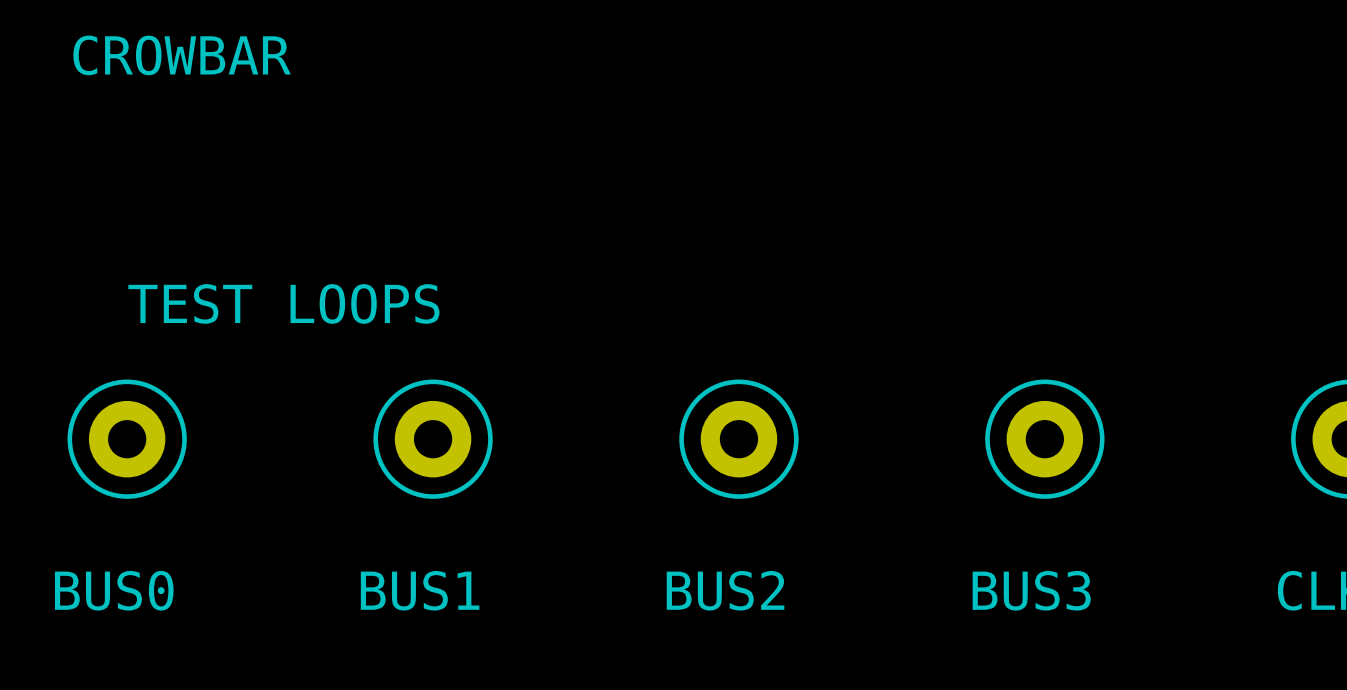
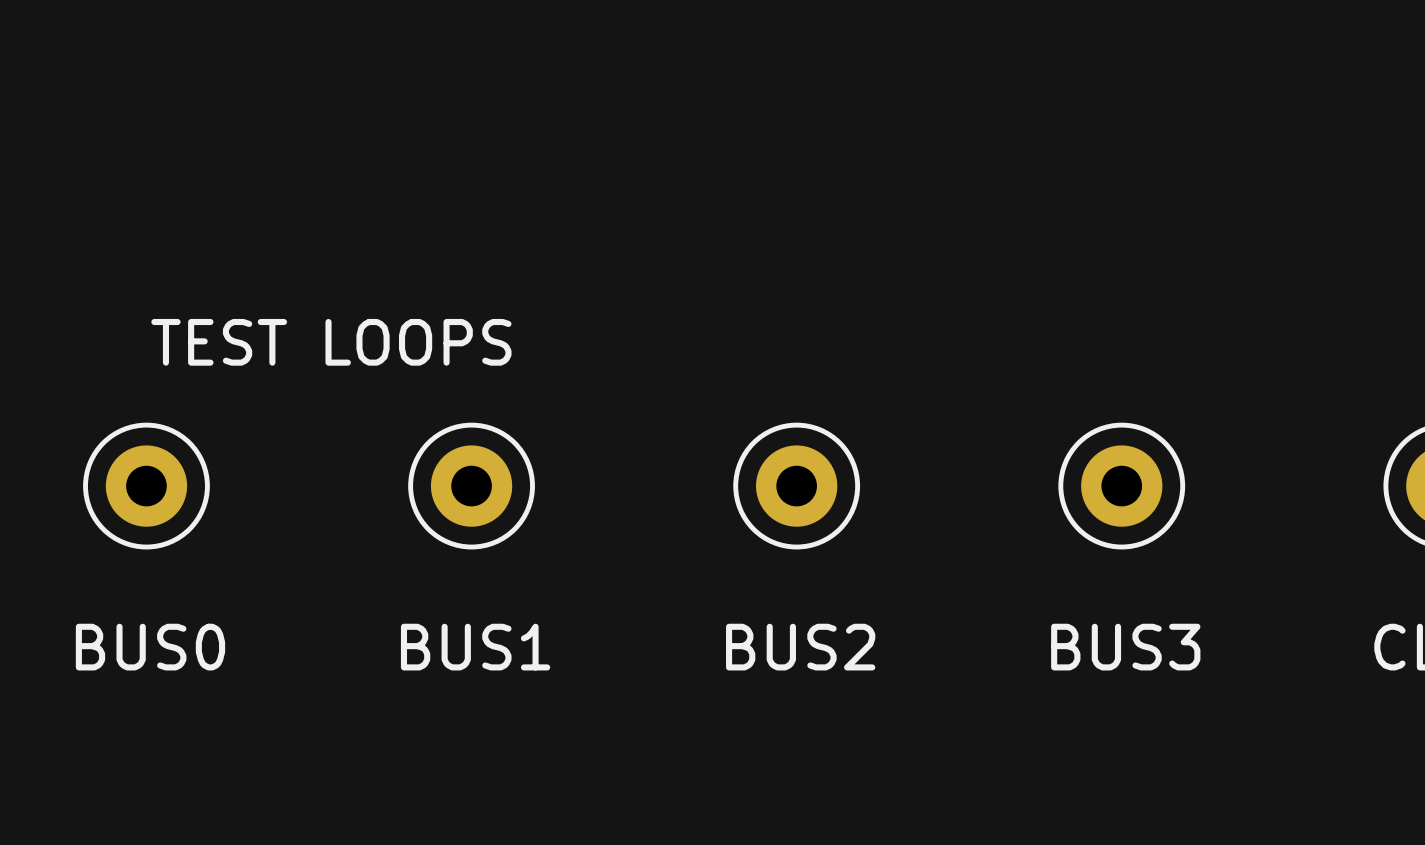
text: CROWBAR (182, 55) -> none

